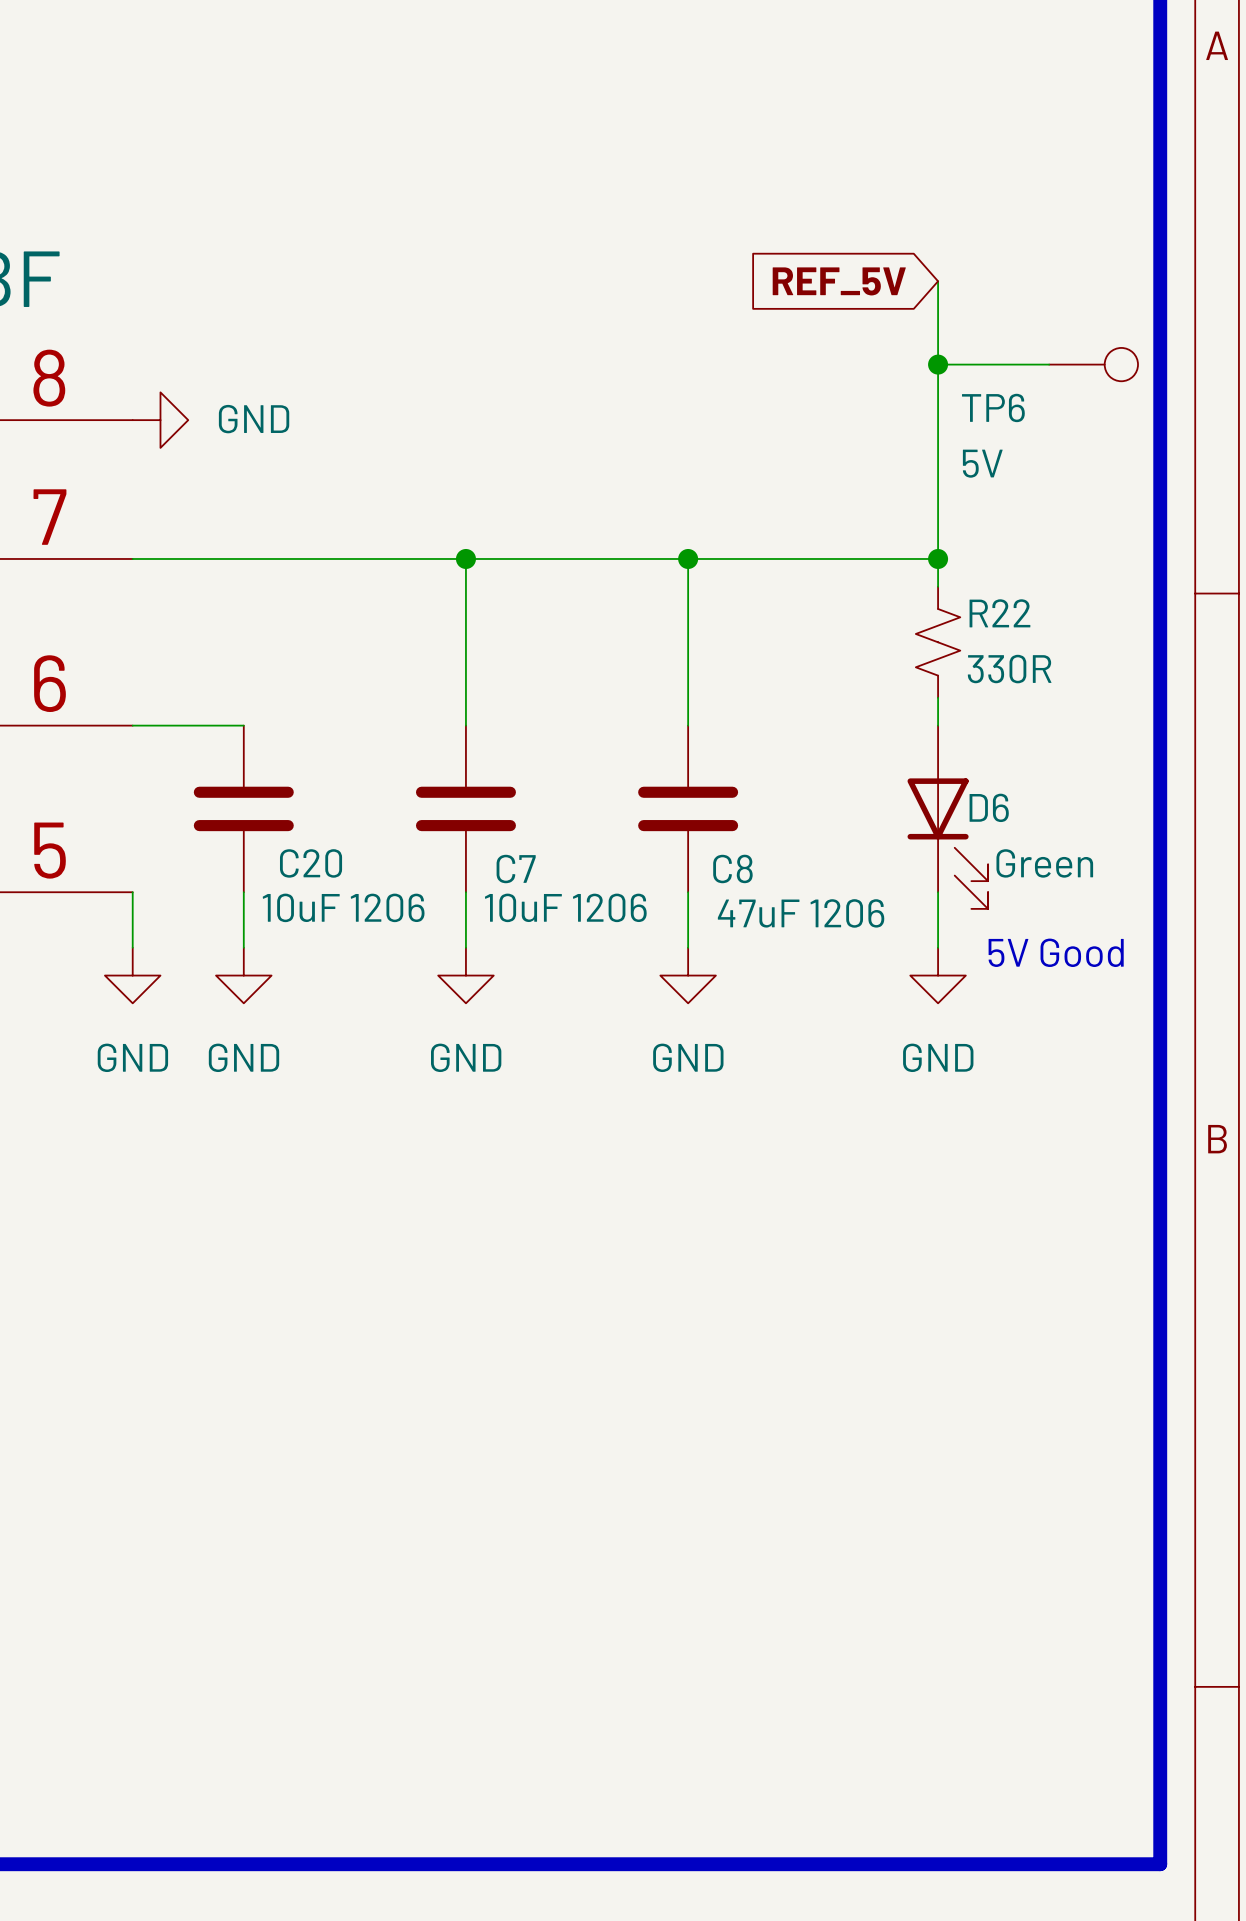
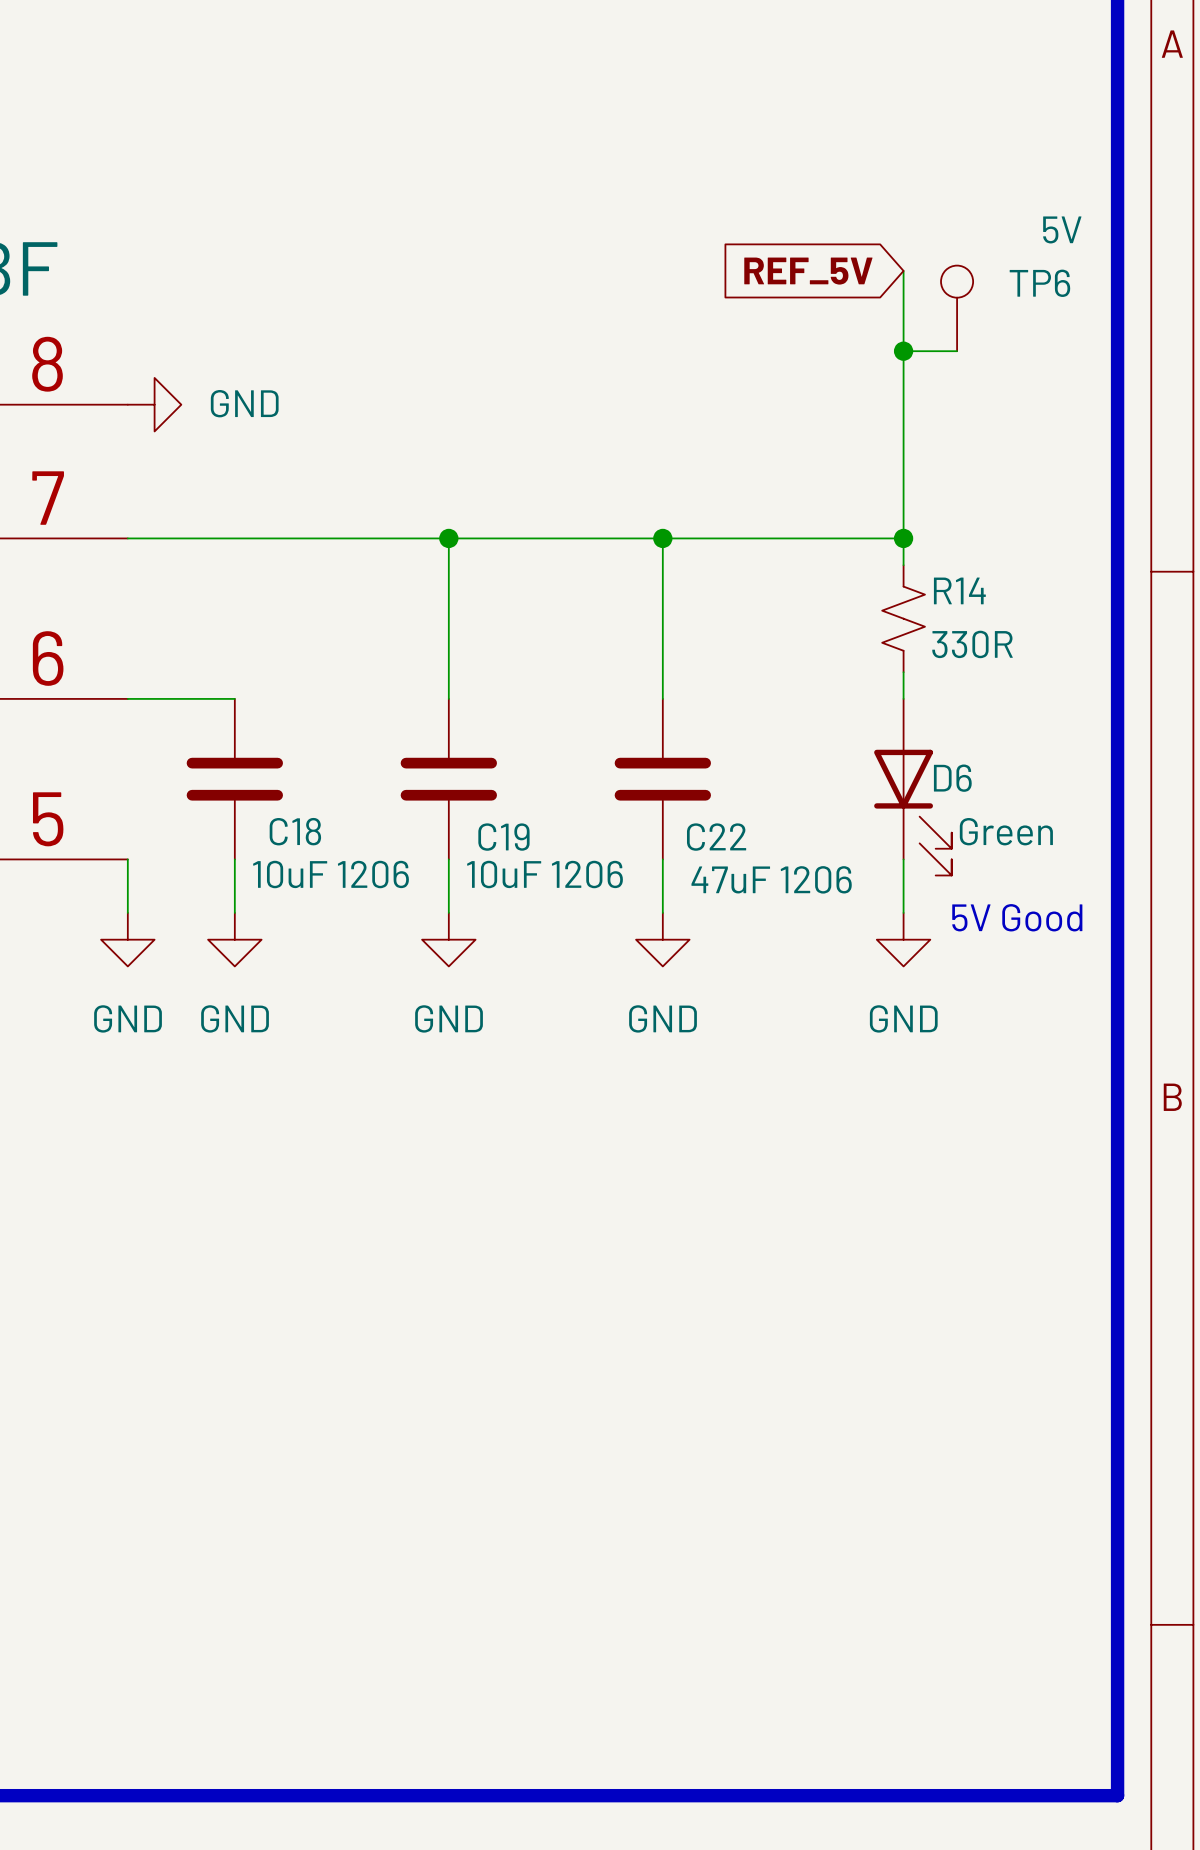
wire: (993, 364) (1049, 364) -> none
TP6 position: (1093, 364) -> (957, 308)
TP6 rotation: 0° (1121, 364) -> 90° counterclockwise (957, 281)
TP6 name position: TP6 (993, 407) -> TP6 (1039, 283)
TP6 value position: 5V (982, 463) -> 5V (1062, 229)
R22 name: R22 (999, 613) -> R14 (959, 590)
C20 name: C20 (311, 863) -> C18 (295, 831)
C8 name: C8 (732, 868) -> C22 (716, 837)
C7 name: C7 (516, 869) -> C19 (503, 837)

